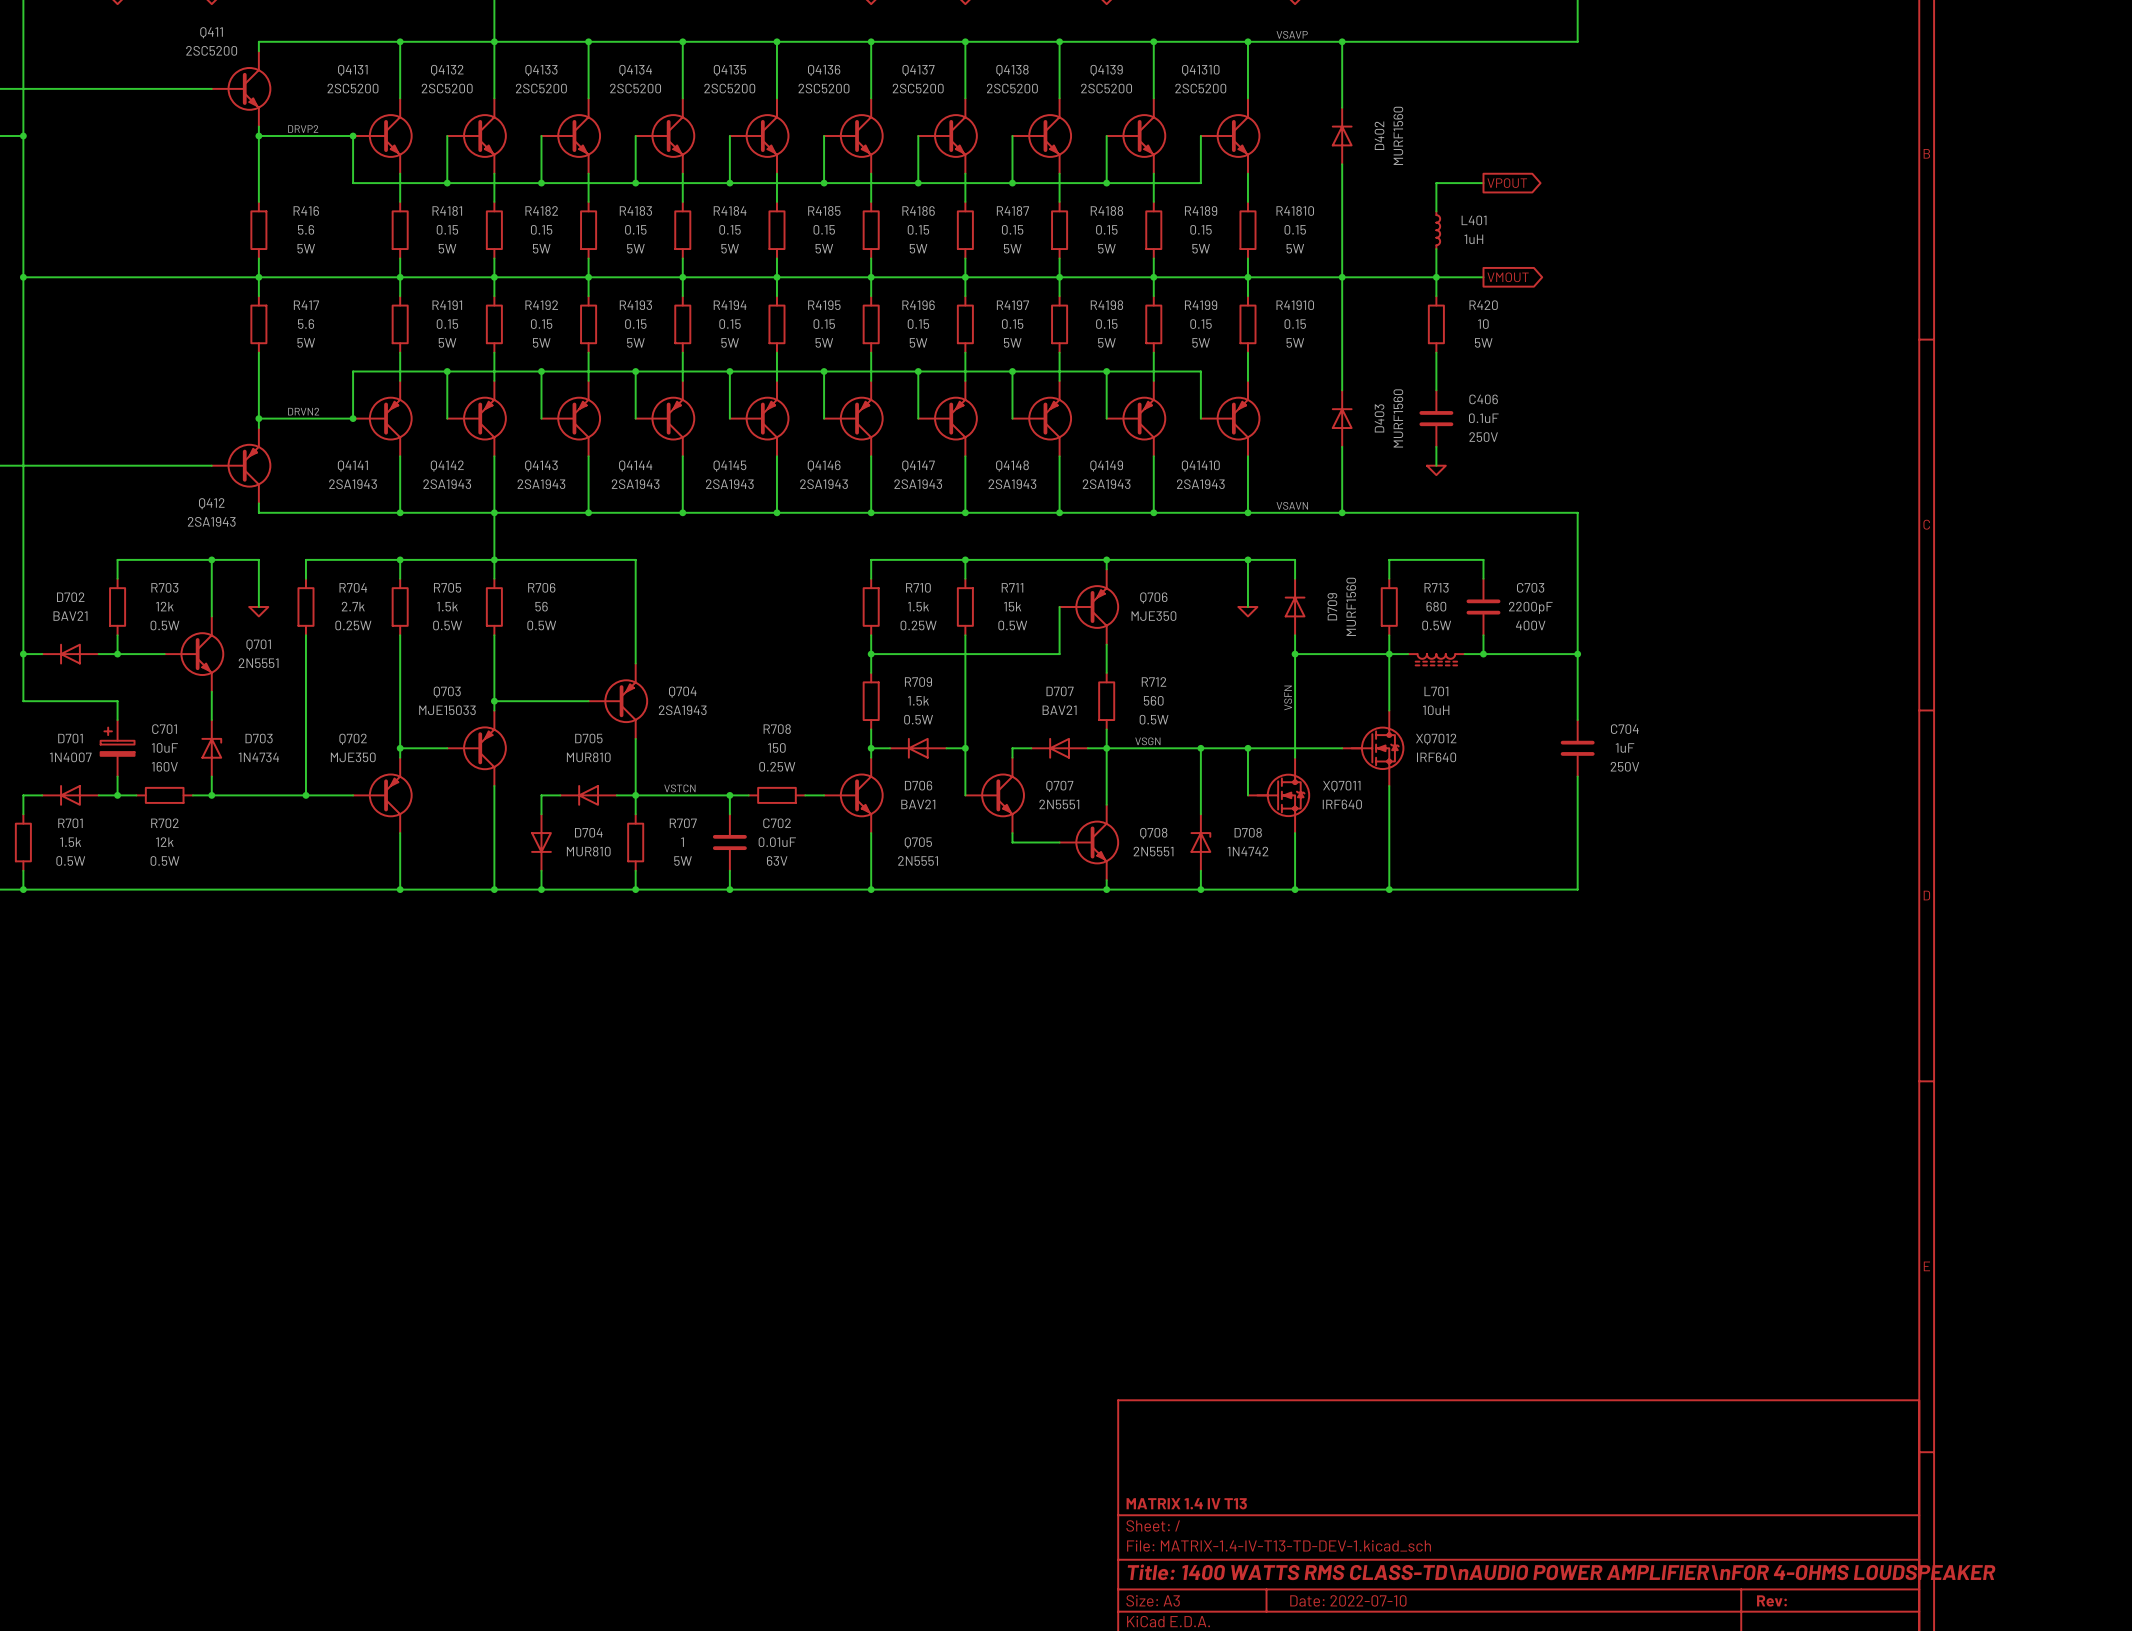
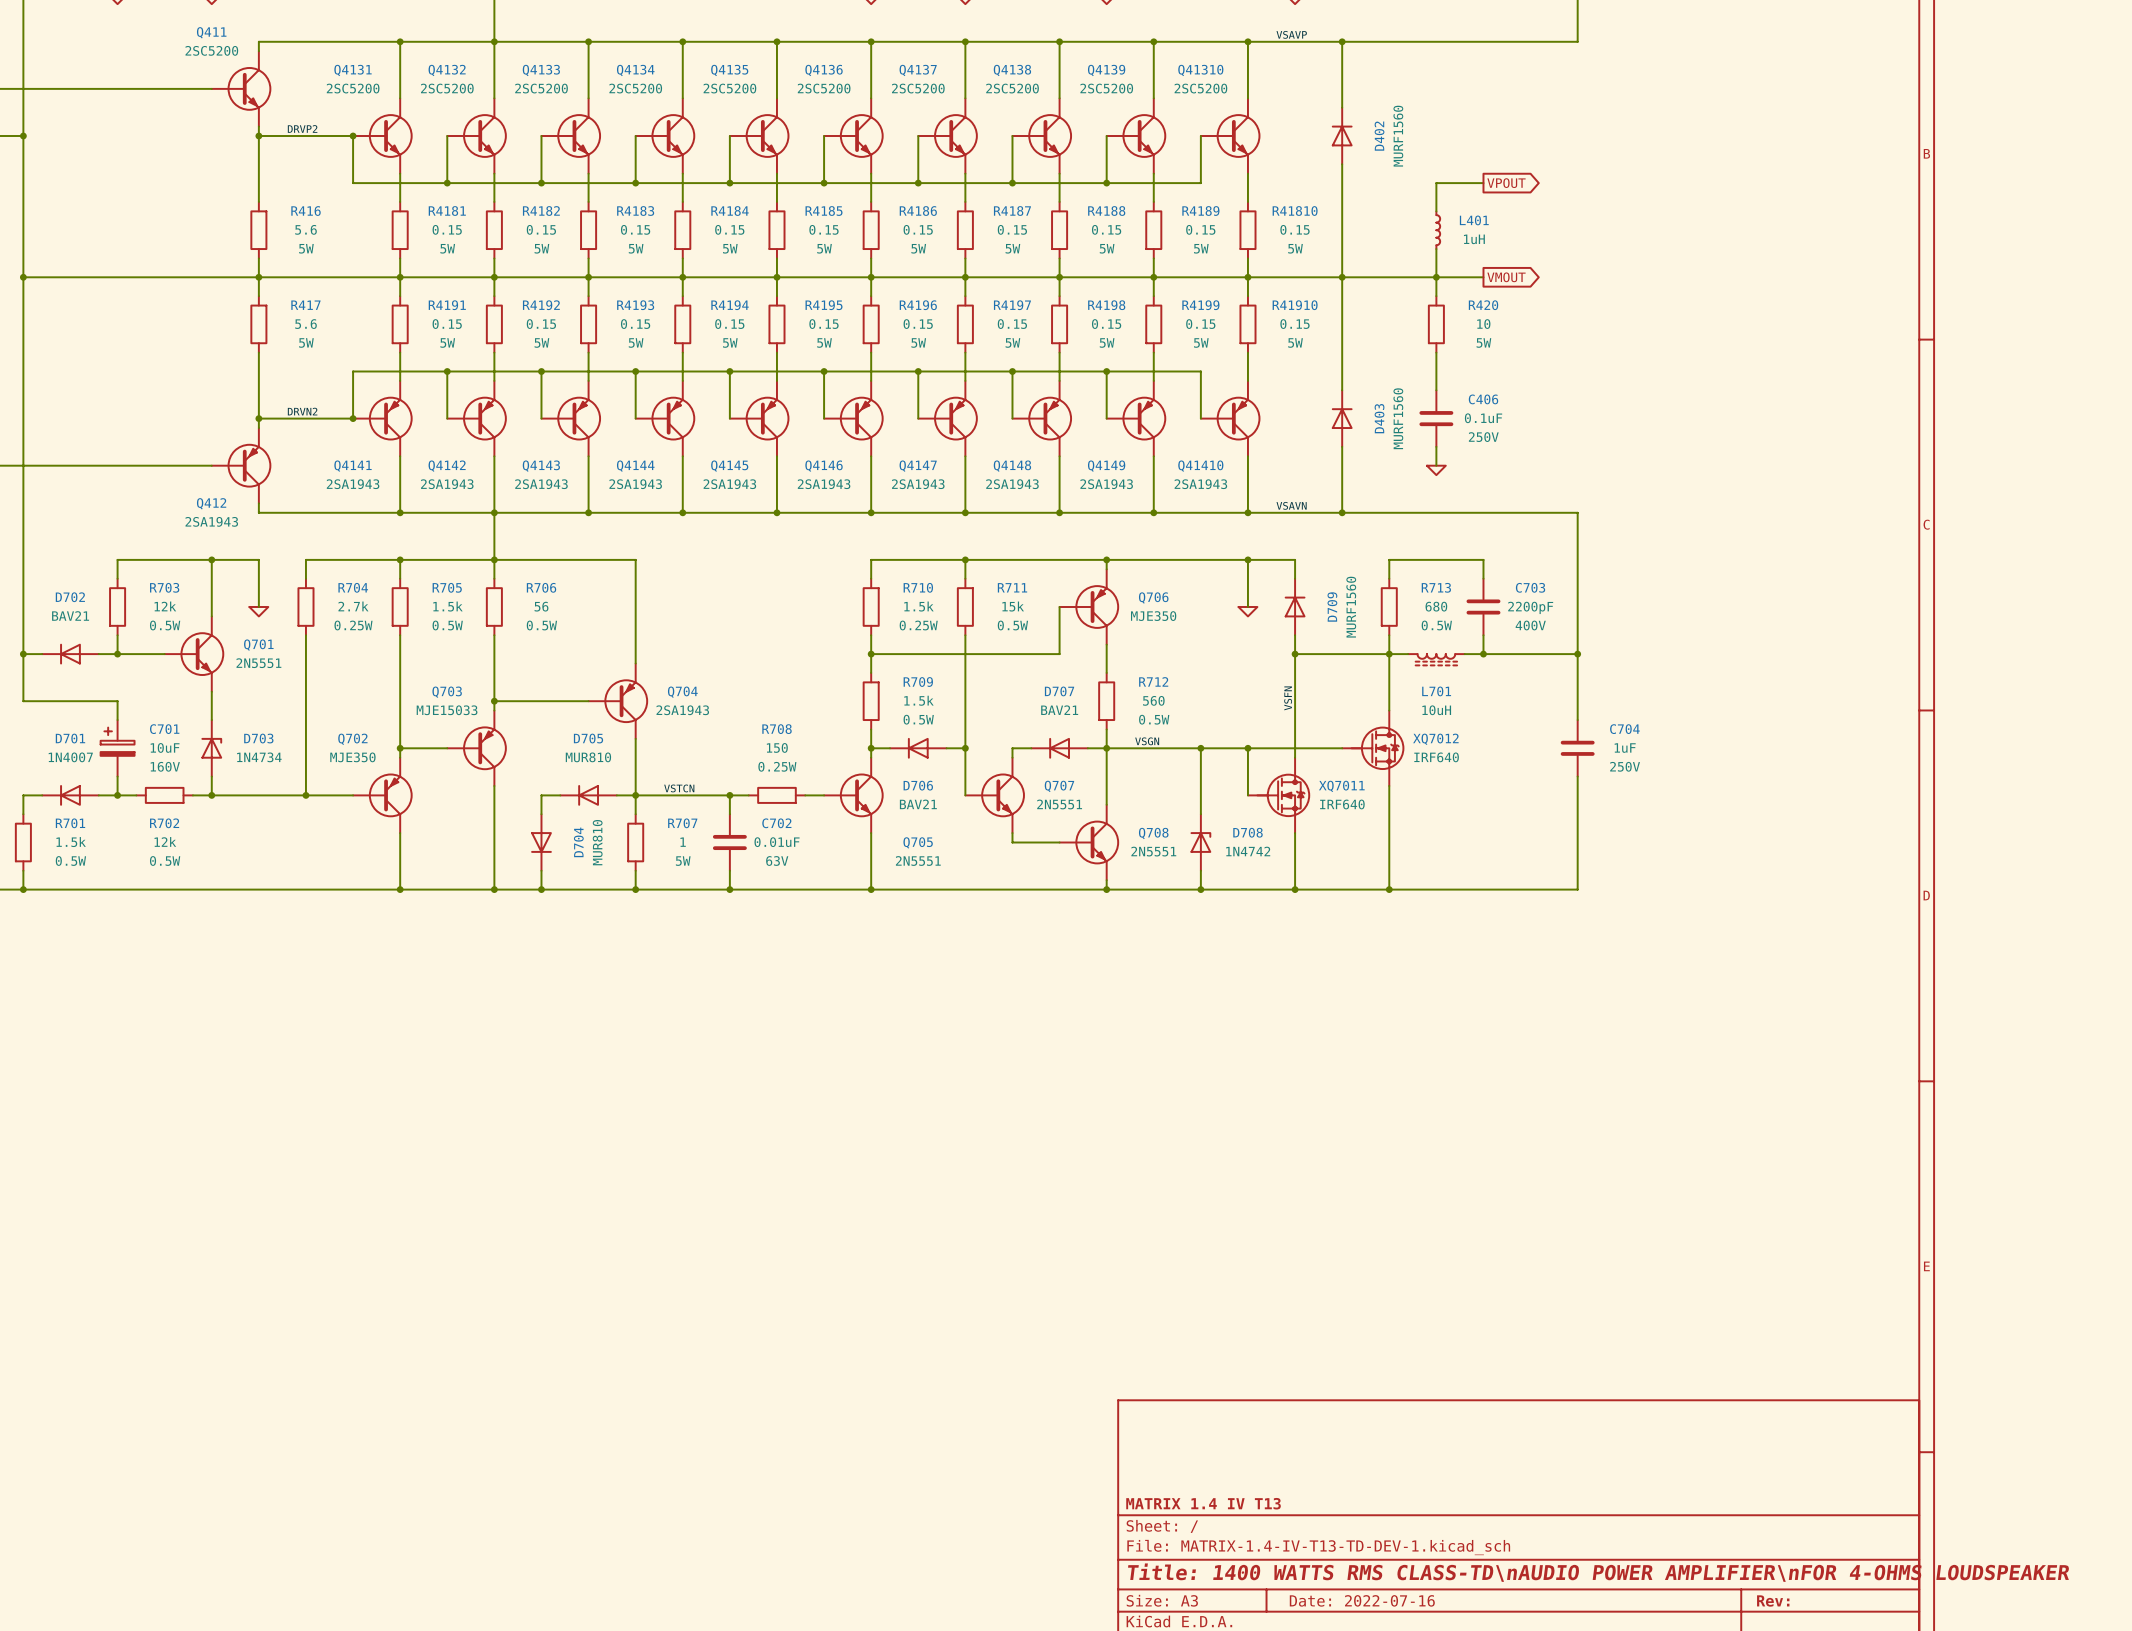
D704 name rotation: 0° (588, 832) -> 90° counterclockwise (578, 842)
D704 value rotation: 0° (588, 851) -> 90° counterclockwise (597, 842)
title block: Date: 2022-07-10 (1348, 1600) -> Date: 2022-07-16 (1362, 1600)

